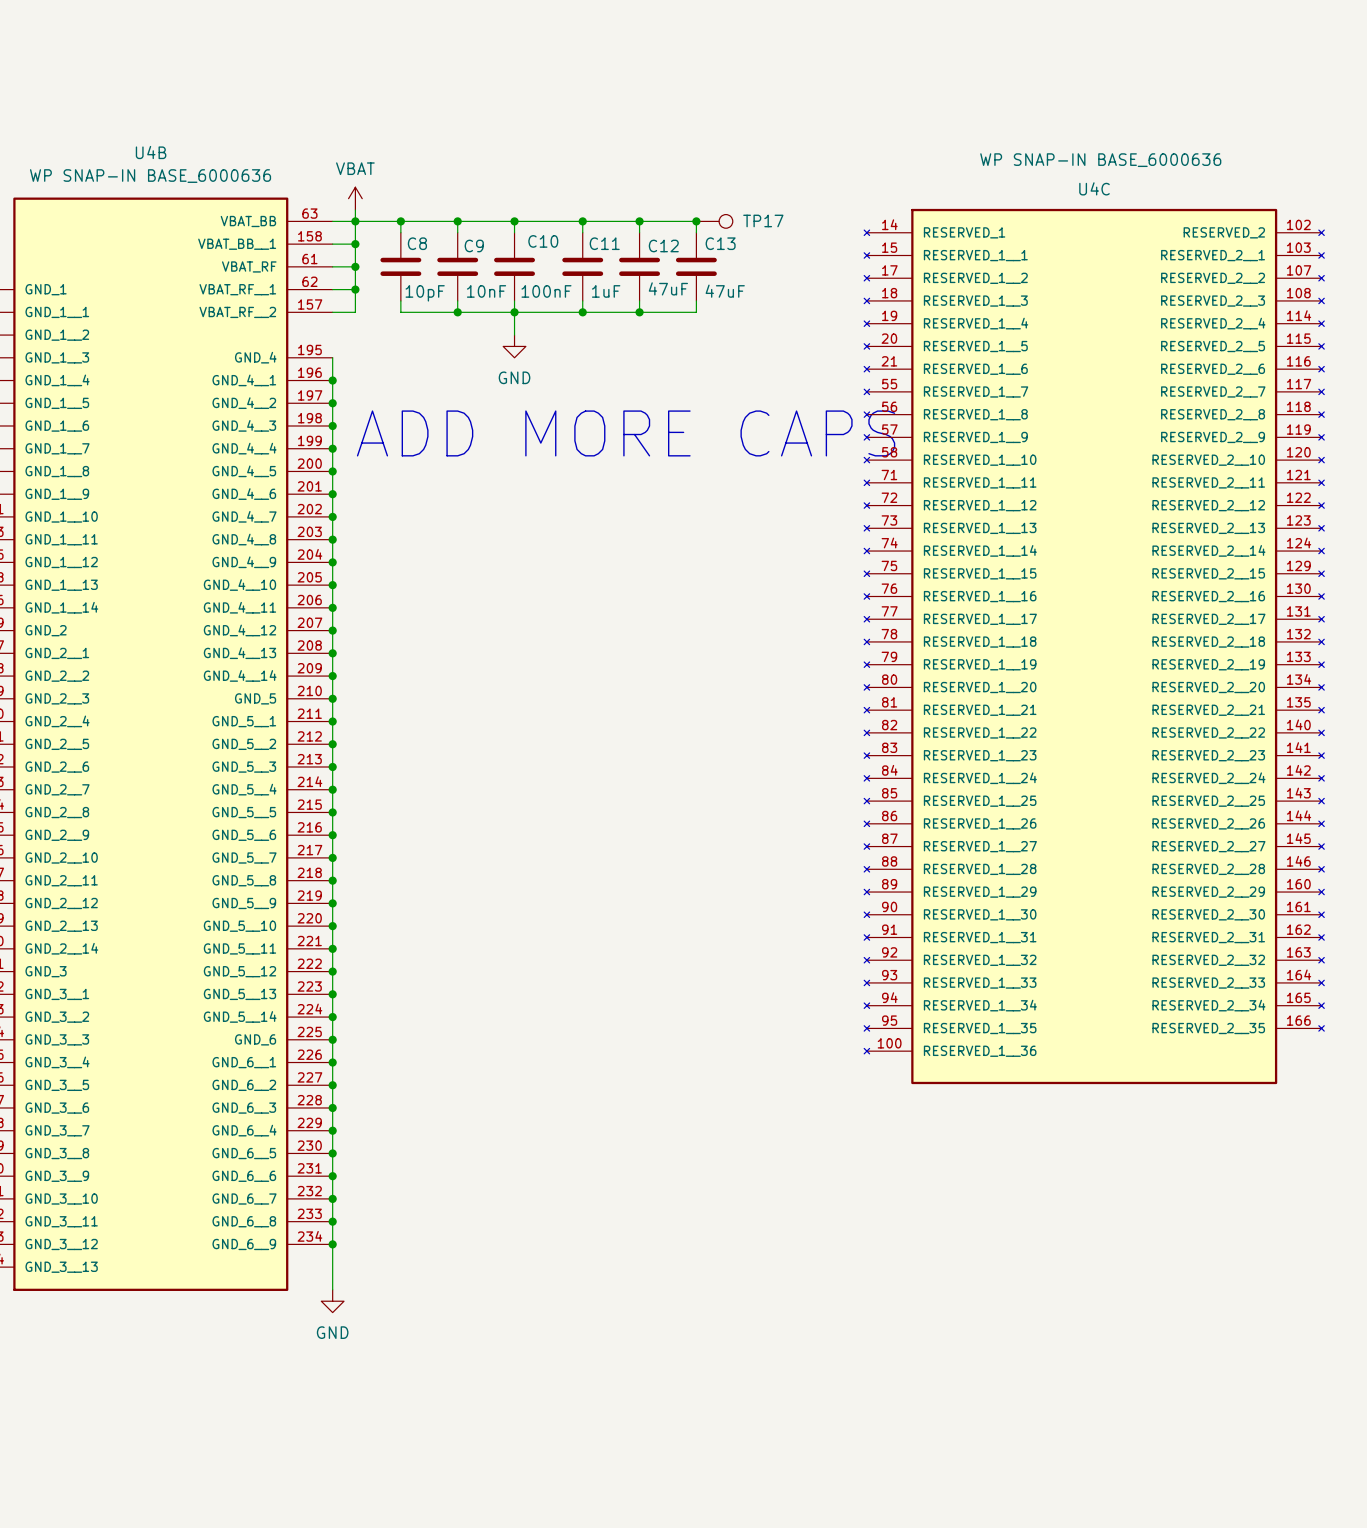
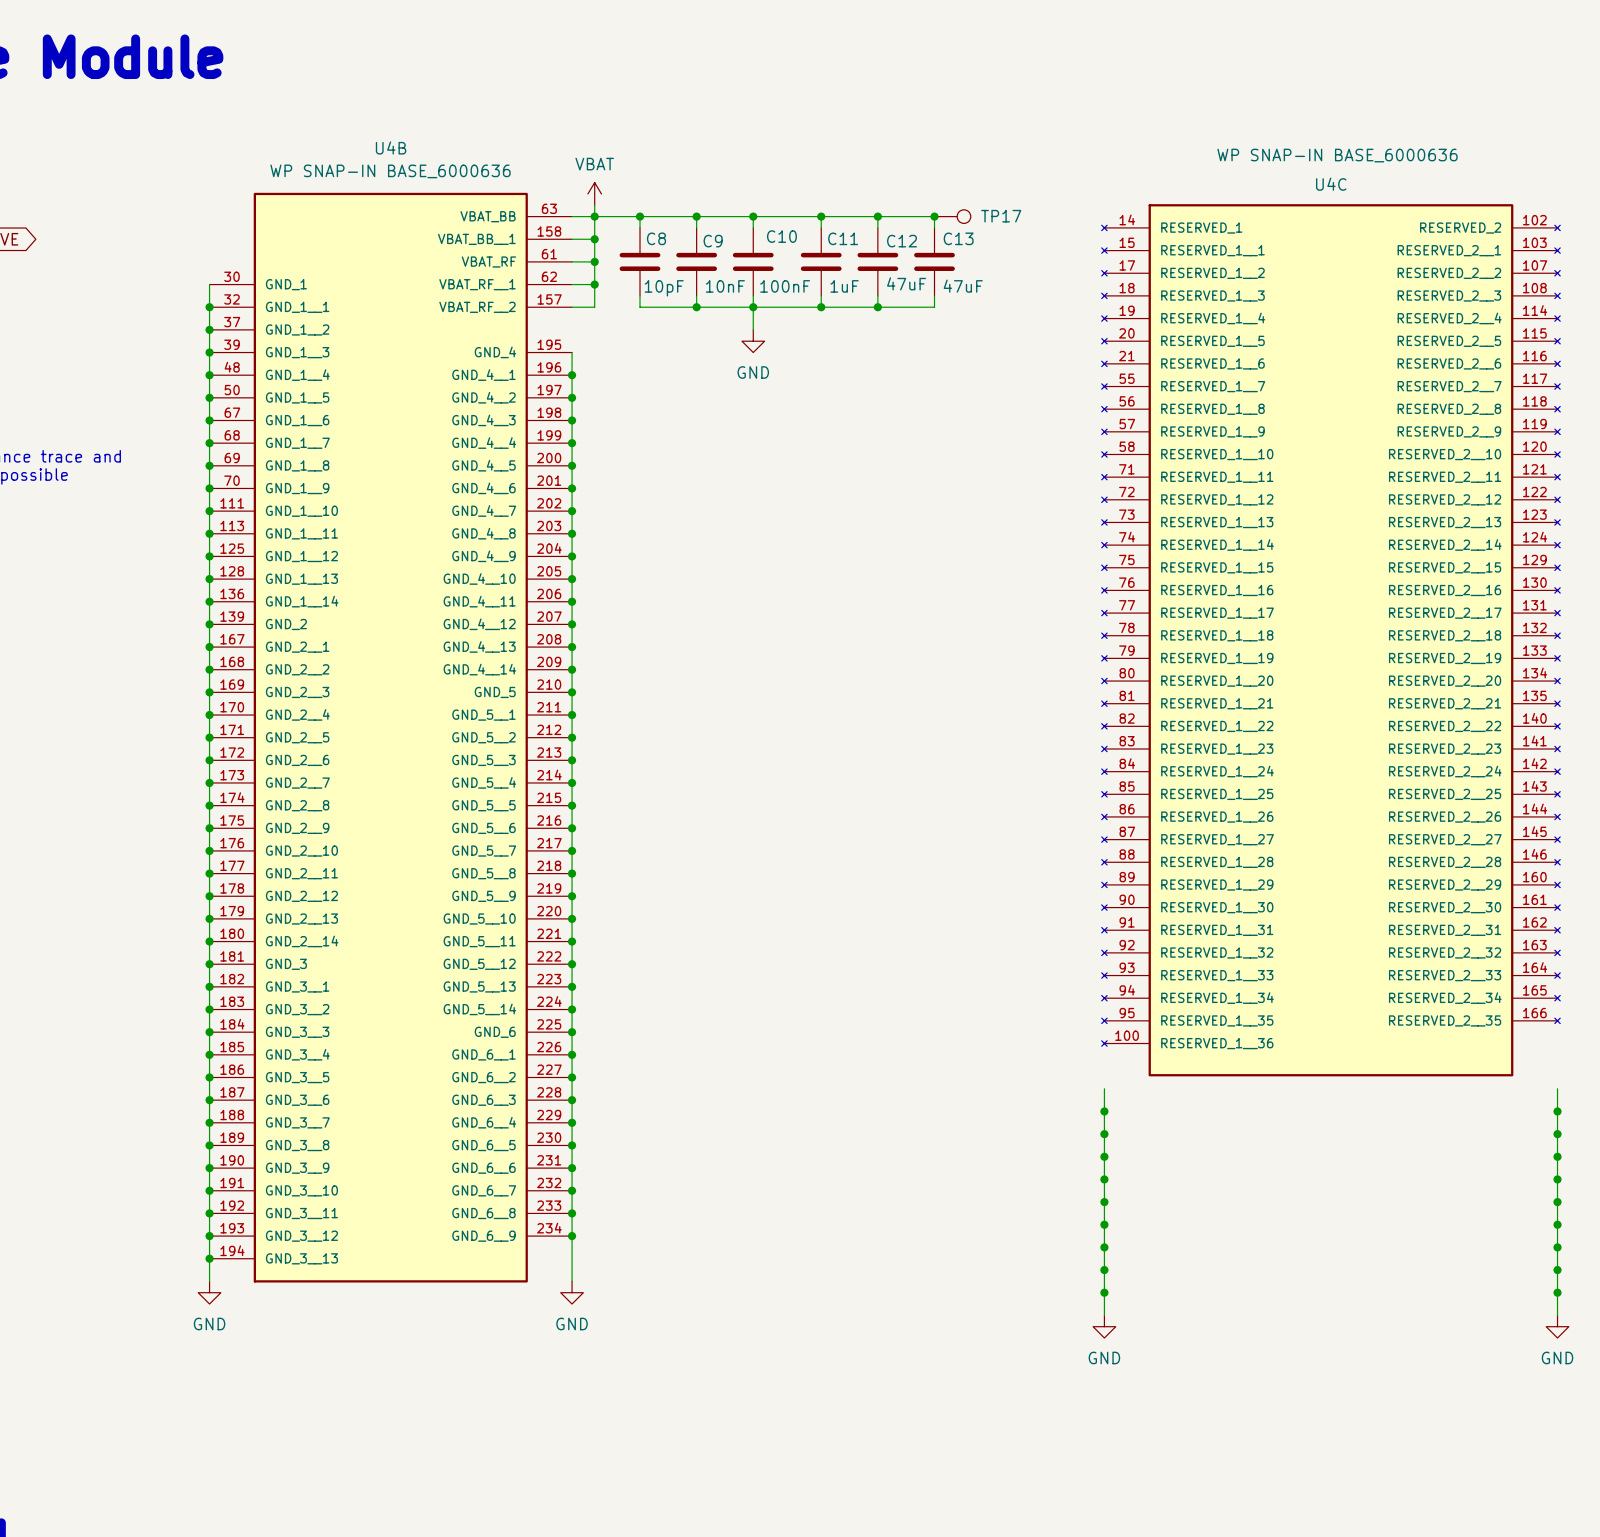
text: ADD MORE CAPS (626, 433) -> none
wire: none -> (1104, 1088) (1104, 1315)
wire: none -> (1557, 1088) (1557, 1315)
junction: none -> (1104, 1111)
junction: none -> (1557, 1111)
junction: none -> (1104, 1134)
junction: none -> (1557, 1134)
junction: none -> (1104, 1156)
junction: none -> (1557, 1156)
junction: none -> (1104, 1179)
junction: none -> (1557, 1179)
junction: none -> (1104, 1202)
junction: none -> (1557, 1202)
junction: none -> (1104, 1224)
junction: none -> (1557, 1224)
junction: none -> (1104, 1247)
junction: none -> (1557, 1247)
junction: none -> (1104, 1270)
junction: none -> (1557, 1270)
junction: none -> (1104, 1292)
junction: none -> (1557, 1292)
power symbol: none -> GND (1104, 1326)
power symbol: none -> GND (1557, 1326)

